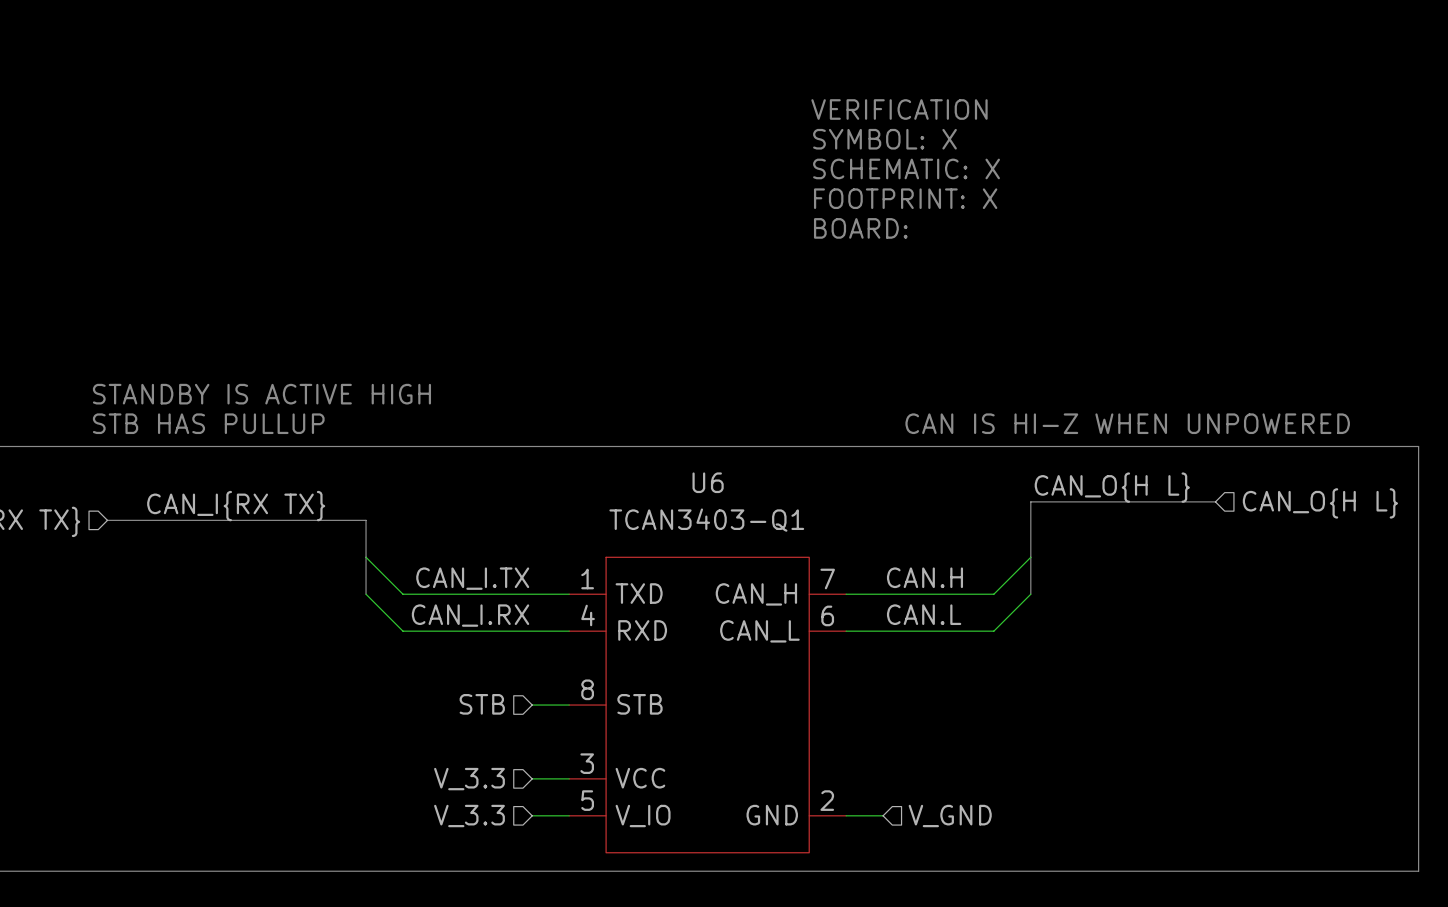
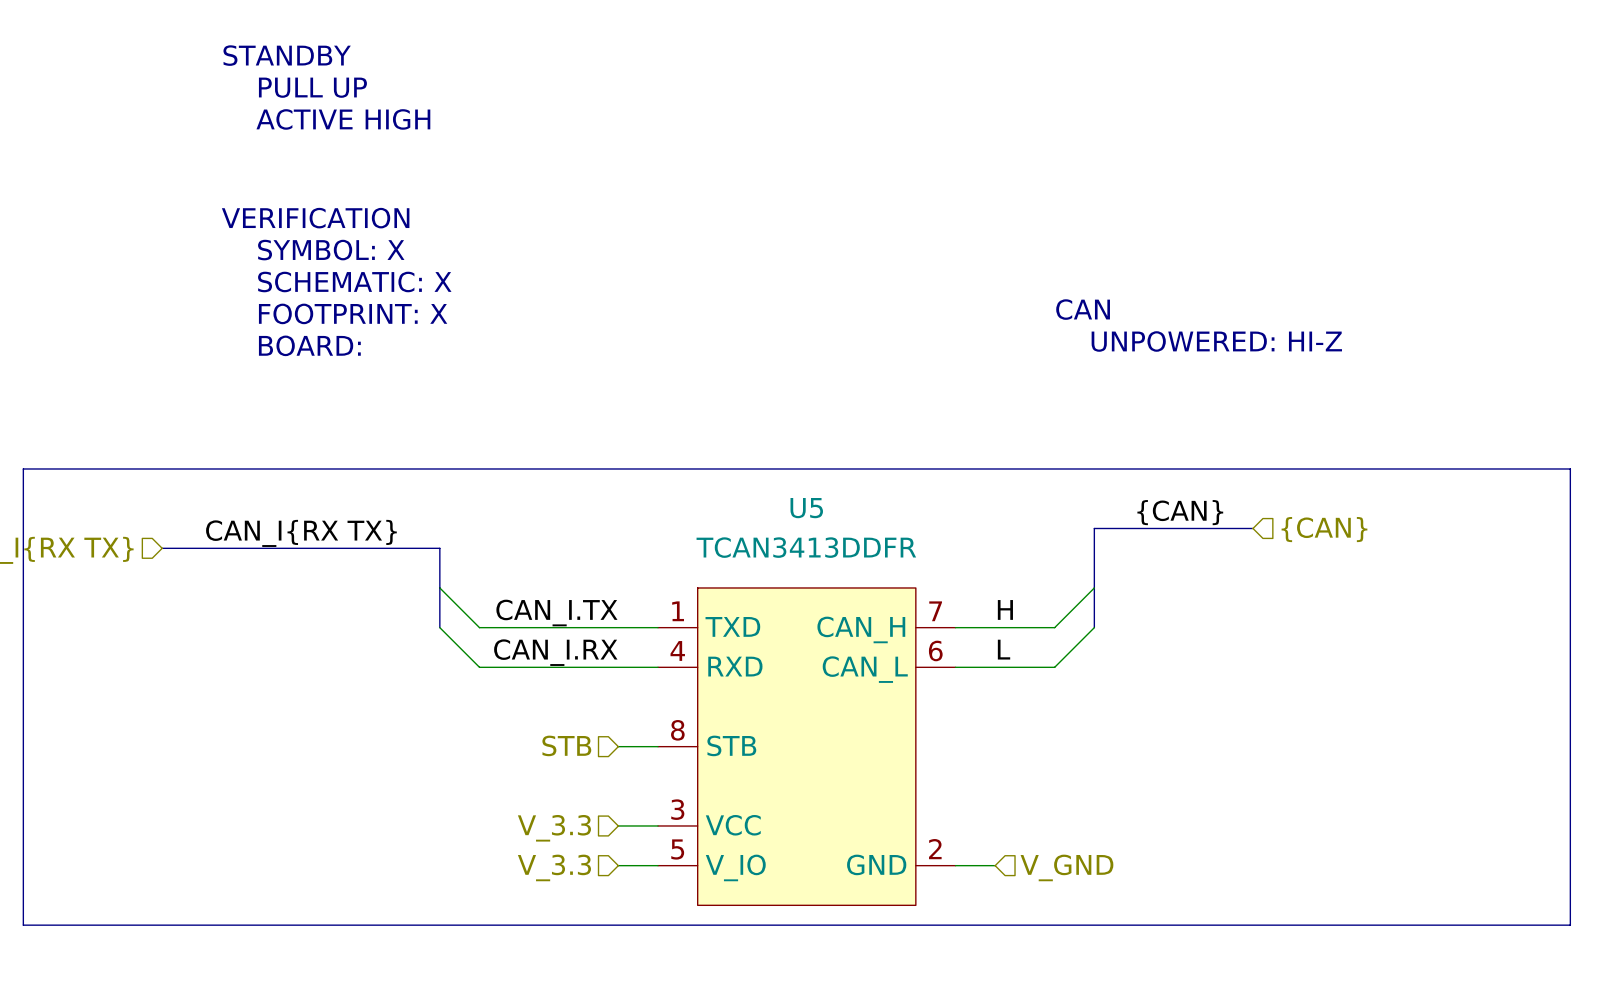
text: none -> STANDBY (287, 55)
text: none -> PULL UP (312, 87)
text: VERIFICATION (899, 109) -> none
text: none -> ACTIVE HIGH (343, 119)
text: SYMBOL: X (884, 139) -> none
text: SCHEMATIC: X (906, 168) -> none
text: FOOTPRINT: X (905, 198) -> none
text: none -> VERIFICATION (315, 218)
text: BOARD: (860, 228) -> none
text: none -> SYMBOL: X (331, 250)
text: none -> SCHEMATIC: X (354, 281)
text: none -> CAN (1083, 309)
text: none -> FOOTPRINT: X (353, 313)
text: none -> UNPOWERED: HI-Z (1216, 341)
text: none -> BOARD: (309, 345)
text: STANDBY IS ACTIVE HIGH (261, 394) -> none
text: STB HAS PULLUP (208, 423) -> none
text: CAN IS HI-Z WHEN UNPOWERED (1127, 423) -> none
U6 name: U6 (708, 482) -> U5 (806, 508)
label: none -> {CAN} (1180, 512)
label: CAN_O{H L} (1112, 487) -> none
bus: (1030, 501) (1030, 594) -> (1153, 528) (1094, 528) (1094, 627)
bus: (1123, 501) (1215, 501) -> none
hierarchical label: none -> {CAN} (1324, 529)
hierarchical label: CAN_O{H L} (1320, 503) -> none
U6 value: TCAN3403-Q1 (706, 520) -> TCAN3413DDFR (806, 547)
wire: (1030, 557) (993, 594) (938, 594) -> (1094, 587) (1054, 627)
label: CAN.H (924, 577) -> H (1005, 609)
wire: (1030, 594) (993, 631) (938, 631) -> (1094, 627) (1054, 667)
label: CAN.L (924, 614) -> L (1004, 649)

